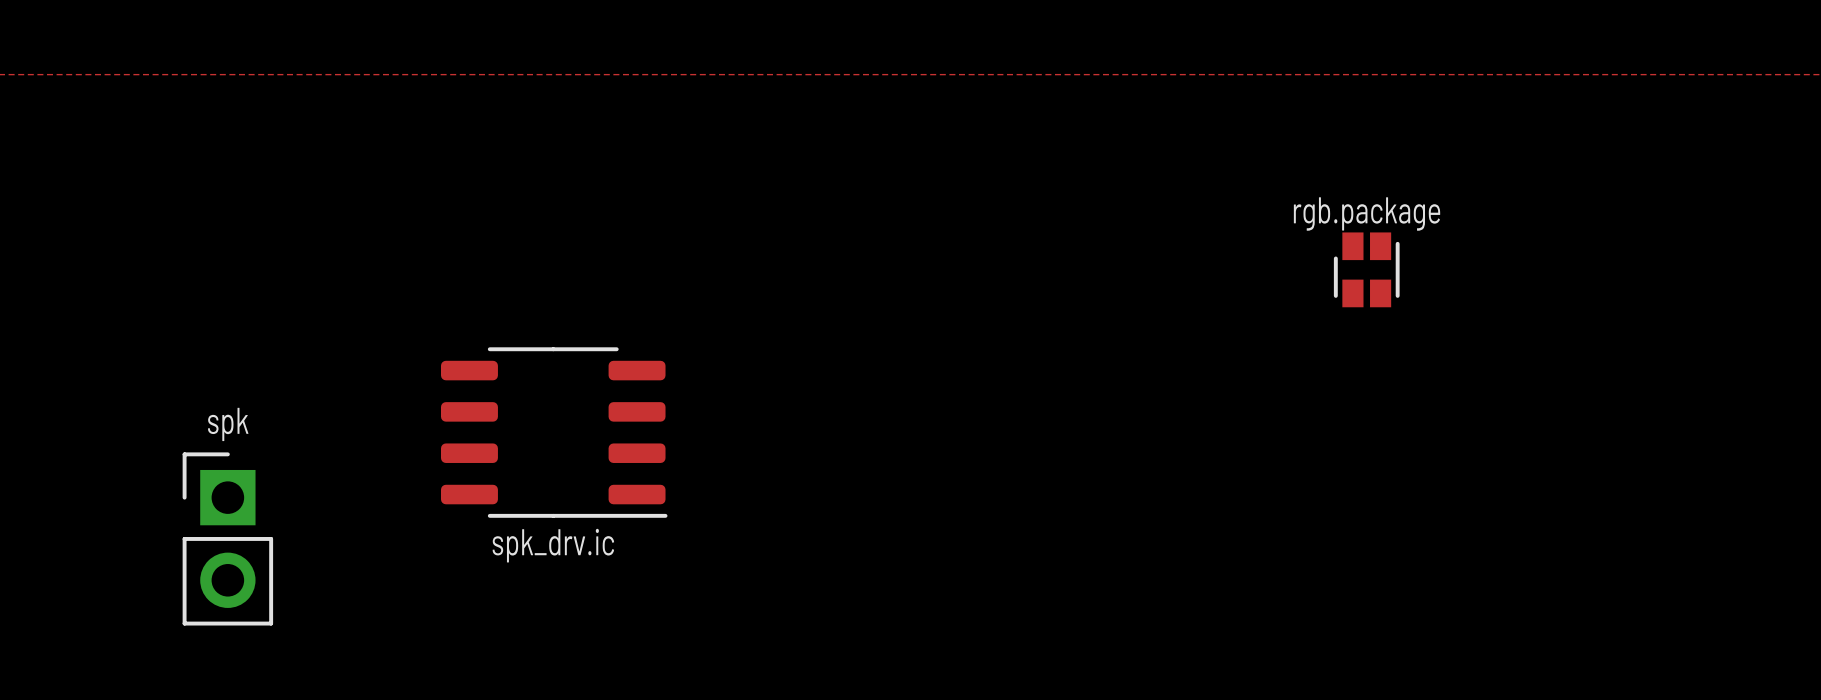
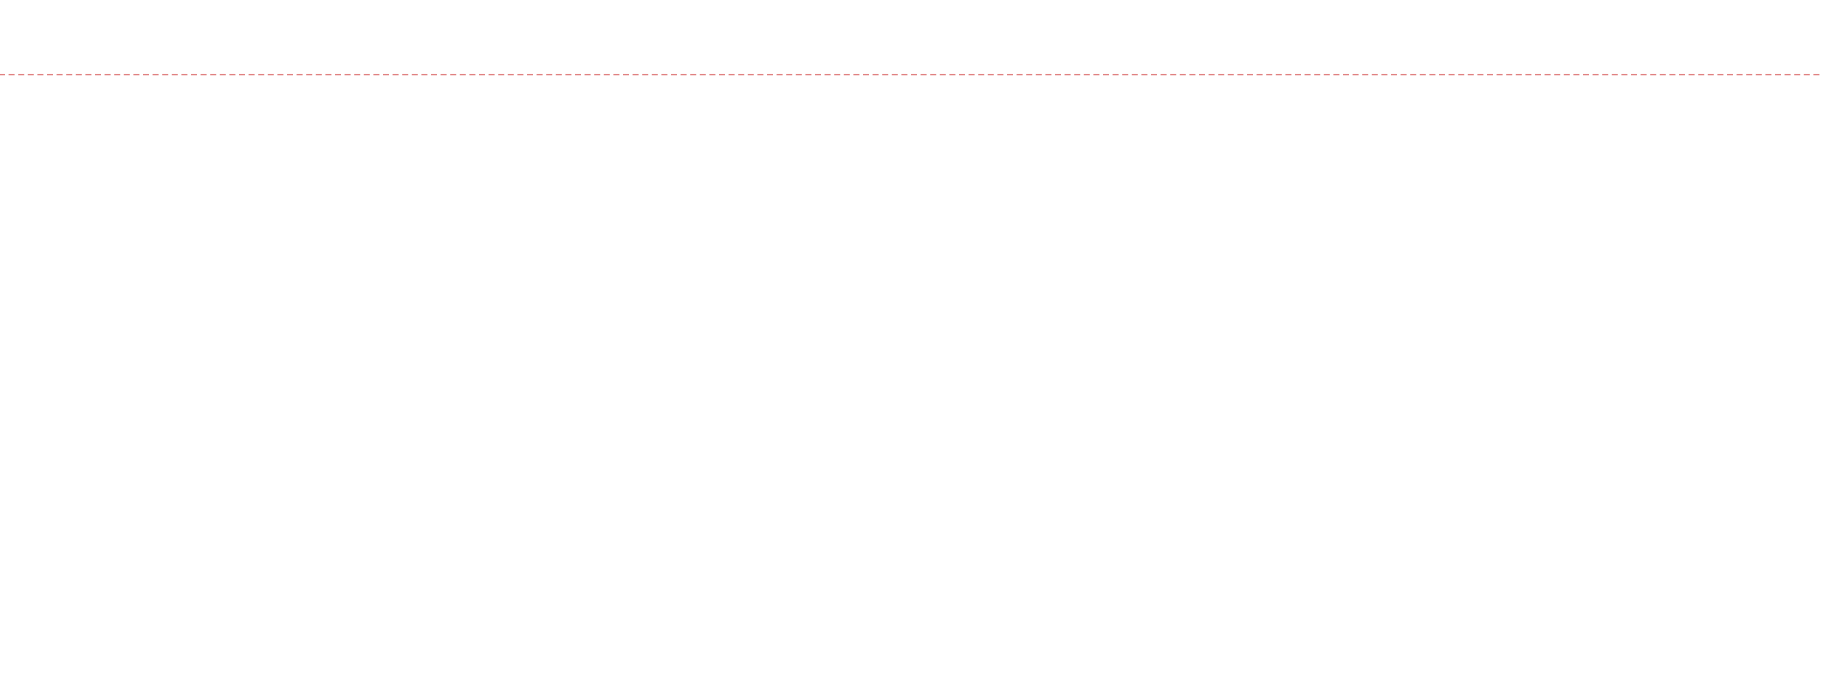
rgb.package: (1366, 269) -> none
spk_drv.ic: (554, 432) -> none
spk: (227, 538) -> none

